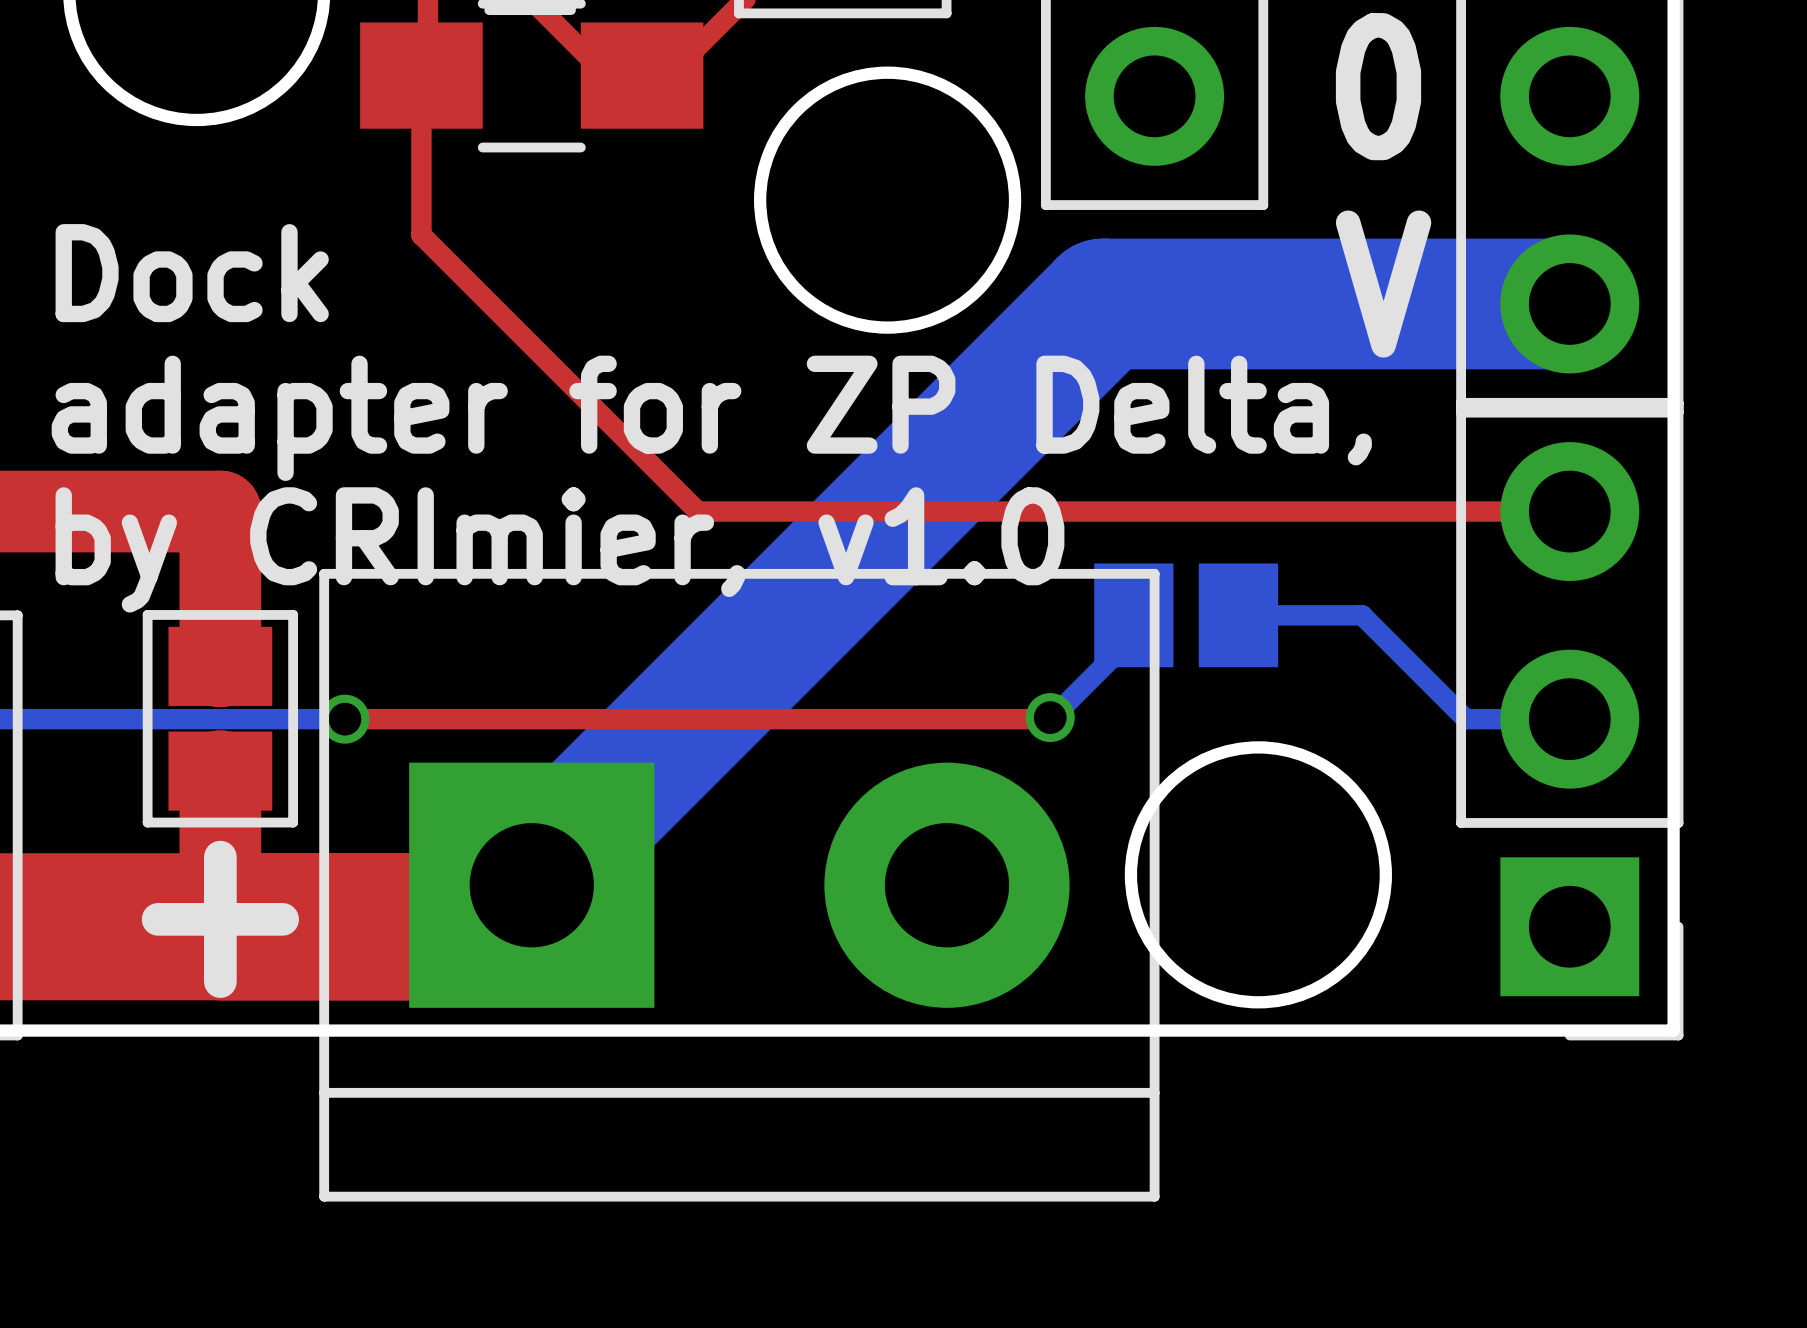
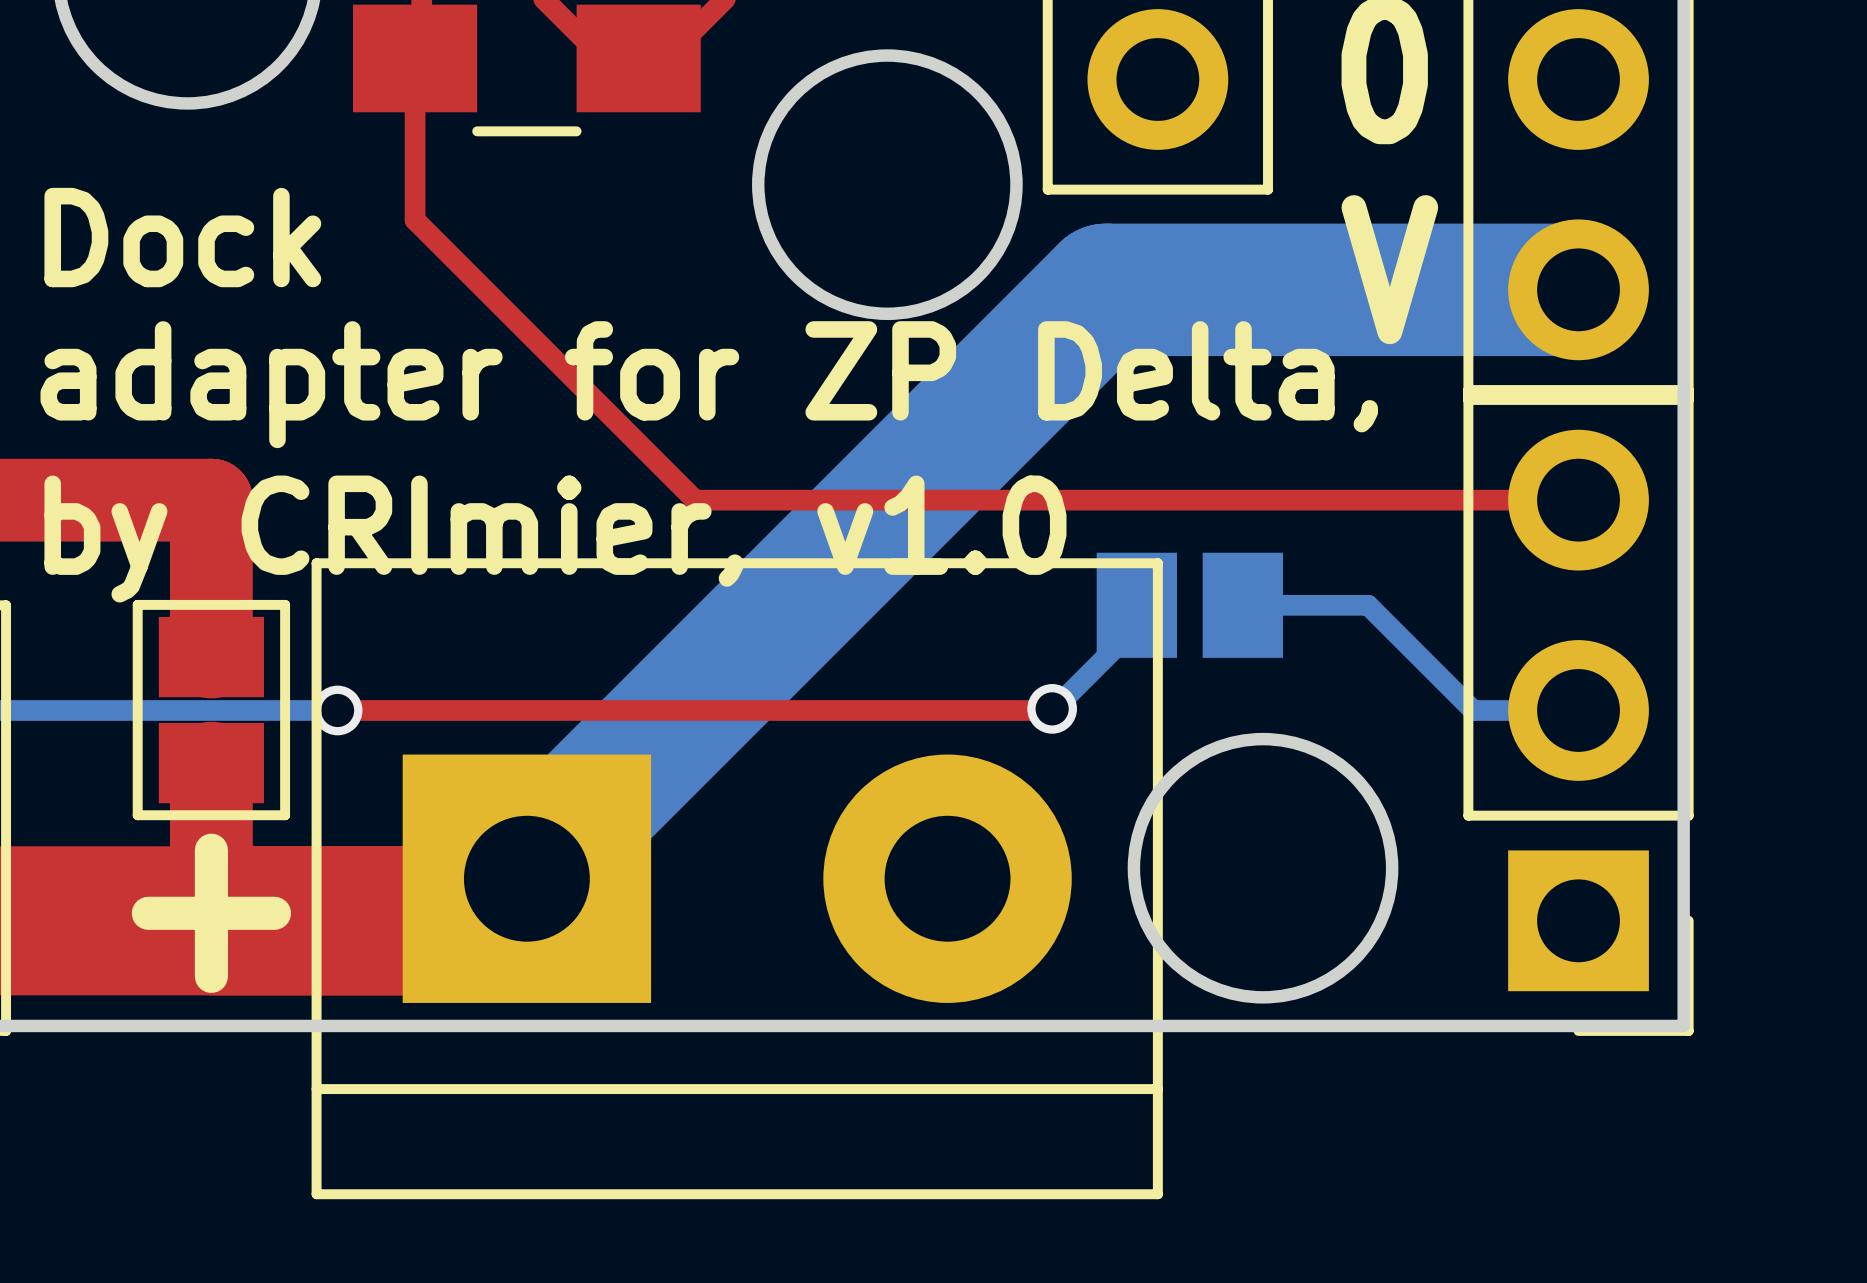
text position: Dock (192, 273) -> Dock (182, 237)
text position: adapter for ZP Delta, (711, 418) -> adapter for ZP Delta, (709, 384)

